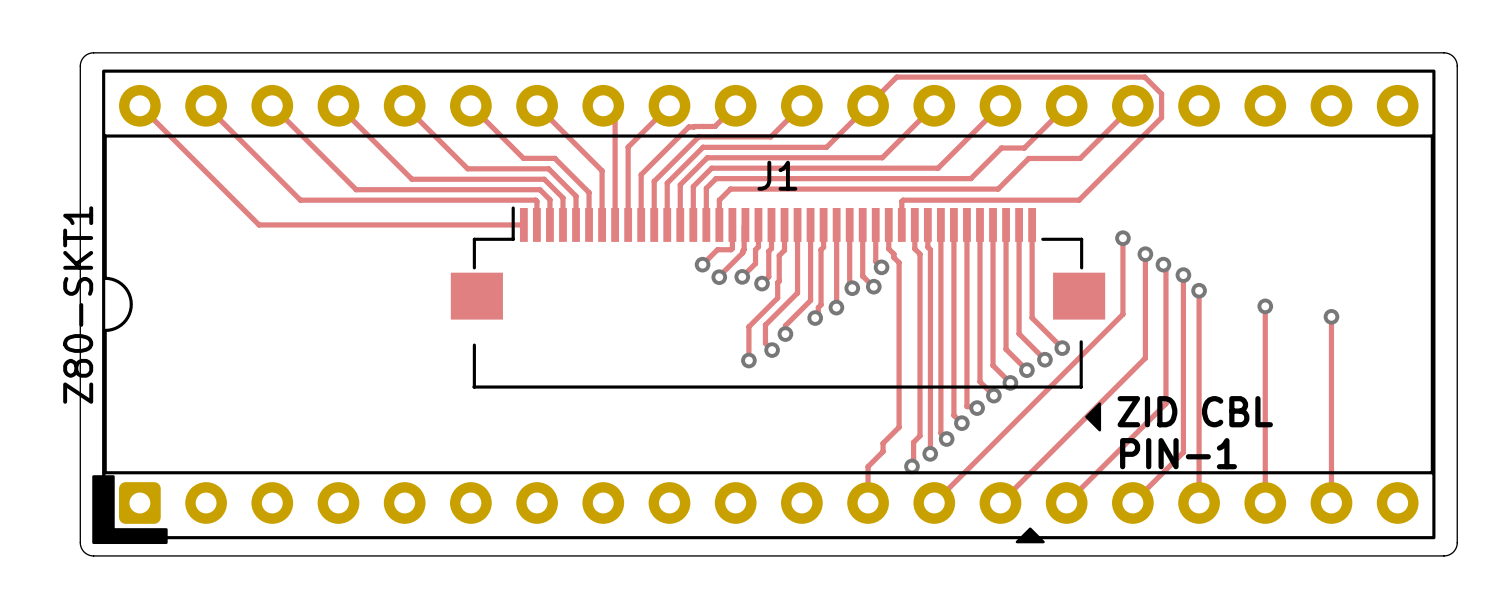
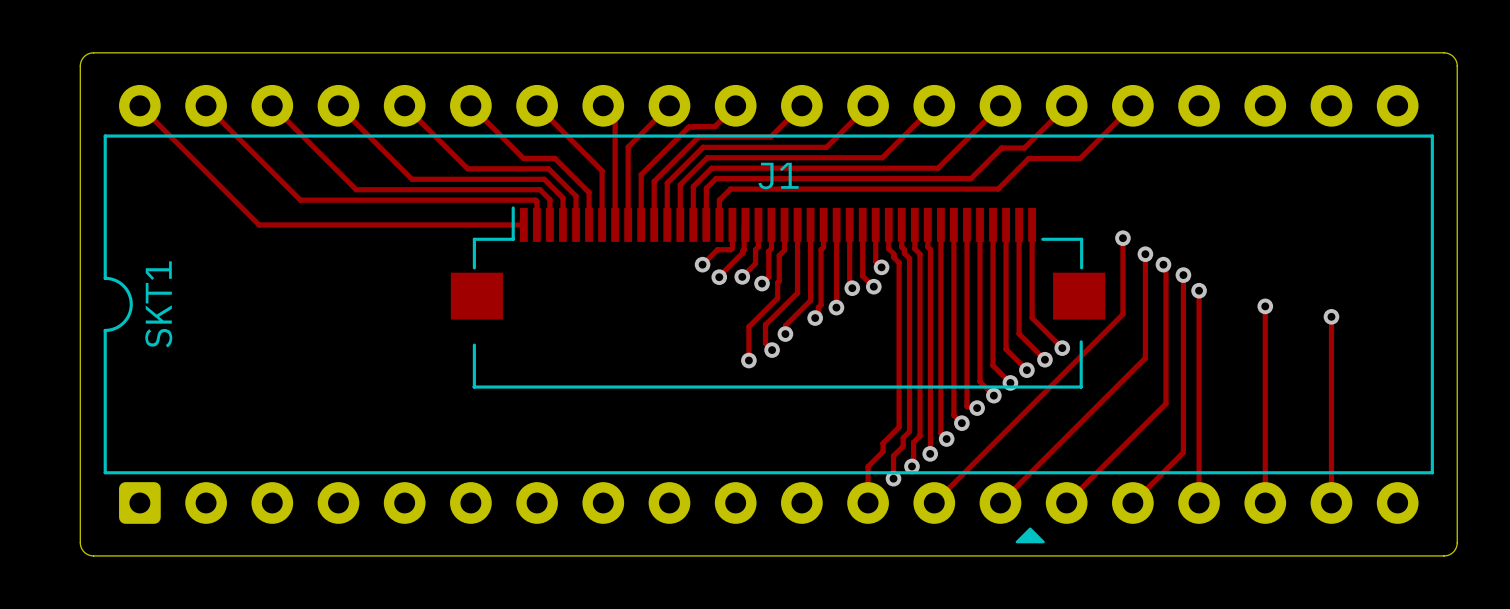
track: (868, 105) (896, 77) (1144, 77) (1161, 93) (1161, 117) (1079, 200) (903, 200) (901, 224) -> (893, 478) (893, 455) (903, 446) (903, 437) (909, 431) (909, 258) (901, 247) (901, 224)
Z80-SKT1: (768, 304) -> none
SKT1: none -> (768, 304)
drawing: [1085, 402, 1102, 432] -> none
text: ZID CBL (1195, 411) -> none
text: PIN-1 (1178, 453) -> none
drawing: [92, 475, 168, 545] -> none
via: none -> (893, 478)

